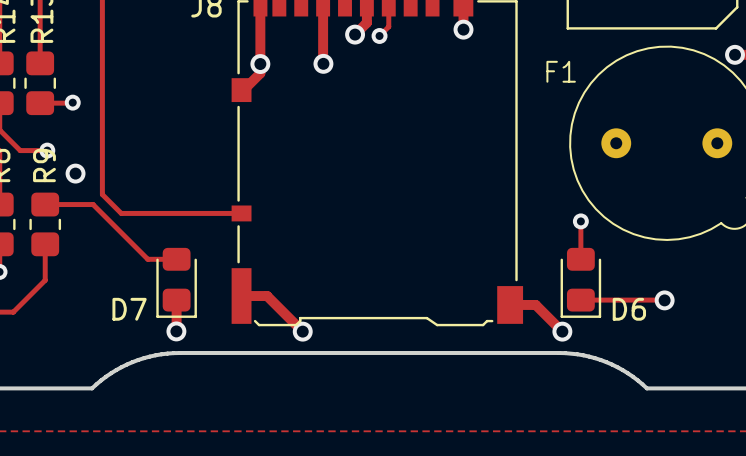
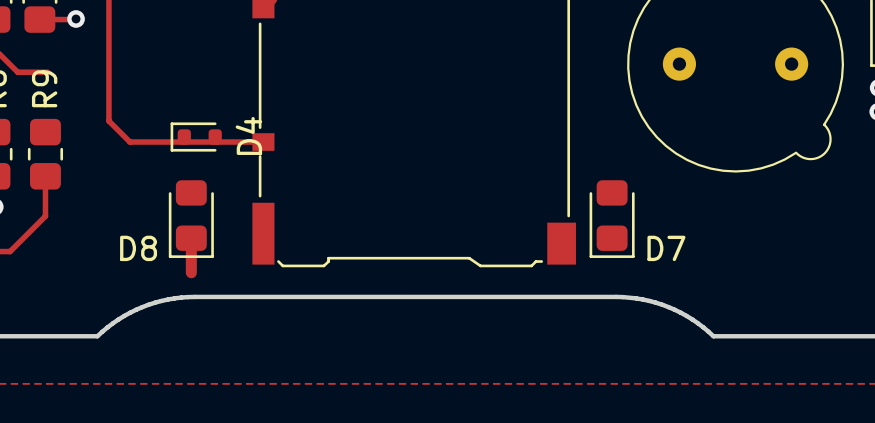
via: (47, 150) -> none
via: (75, 173) -> none
track: (45, 204) (93, 204) (147, 259) (176, 259) -> none
D4: none -> (196, 137)
track: (580, 221) (580, 259) -> none
via: (580, 221) -> none
D7: none -> (612, 219)
D6: (580, 282) -> none
track: (241, 296) (267, 296) (302, 331) -> none
track: (580, 300) (664, 300) -> none
via: (664, 300) -> none
track: (510, 304) (535, 304) (562, 331) -> none
D7 name: D7 (129, 309) -> D8 (138, 248)
via: (176, 331) -> none
via: (302, 331) -> none
via: (562, 331) -> none

